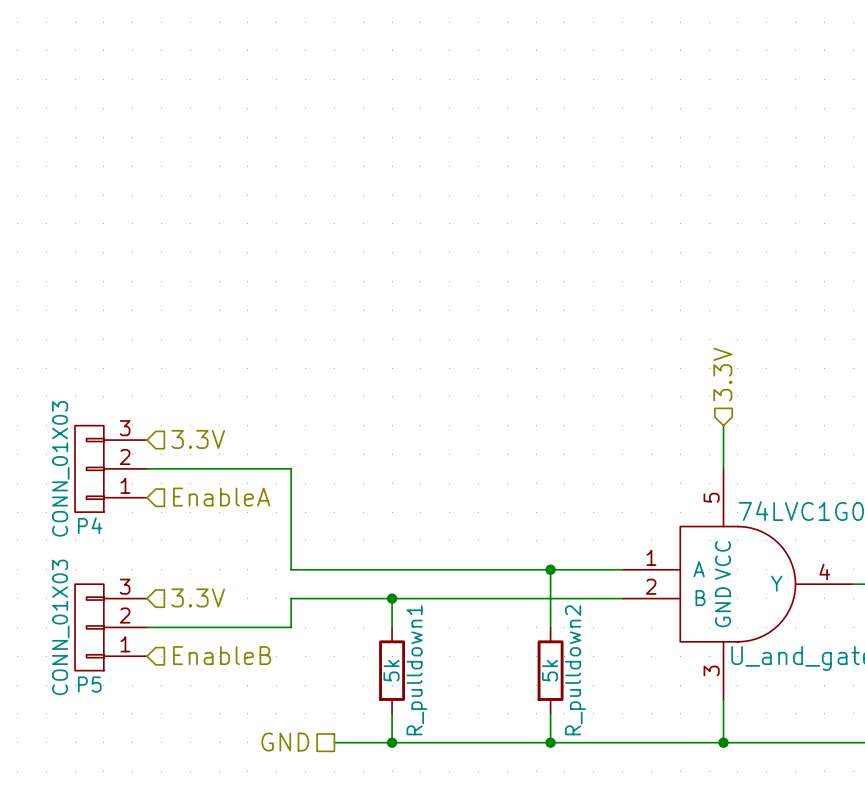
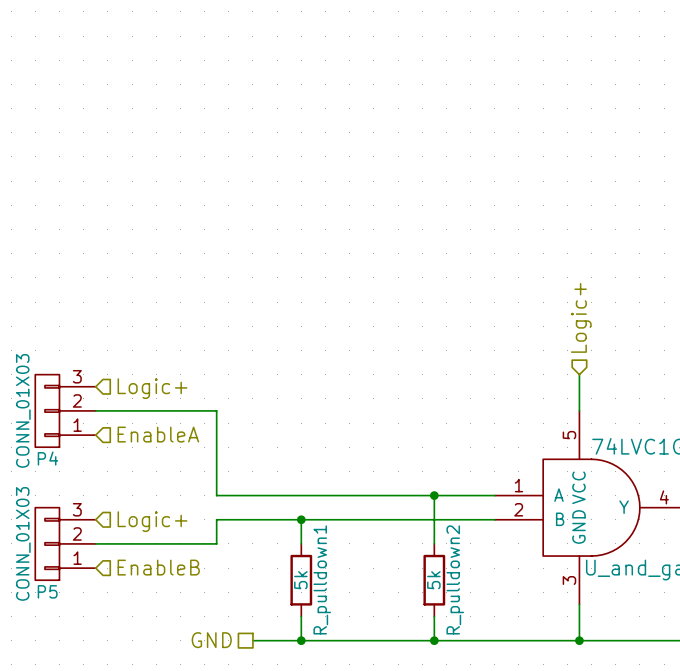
hierarchical label: 3.3V (722, 374) -> Logic+ (581, 317)
hierarchical label: 3.3V (198, 439) -> Logic+ (152, 388)
hierarchical label: 3.3V (198, 597) -> Logic+ (152, 521)

